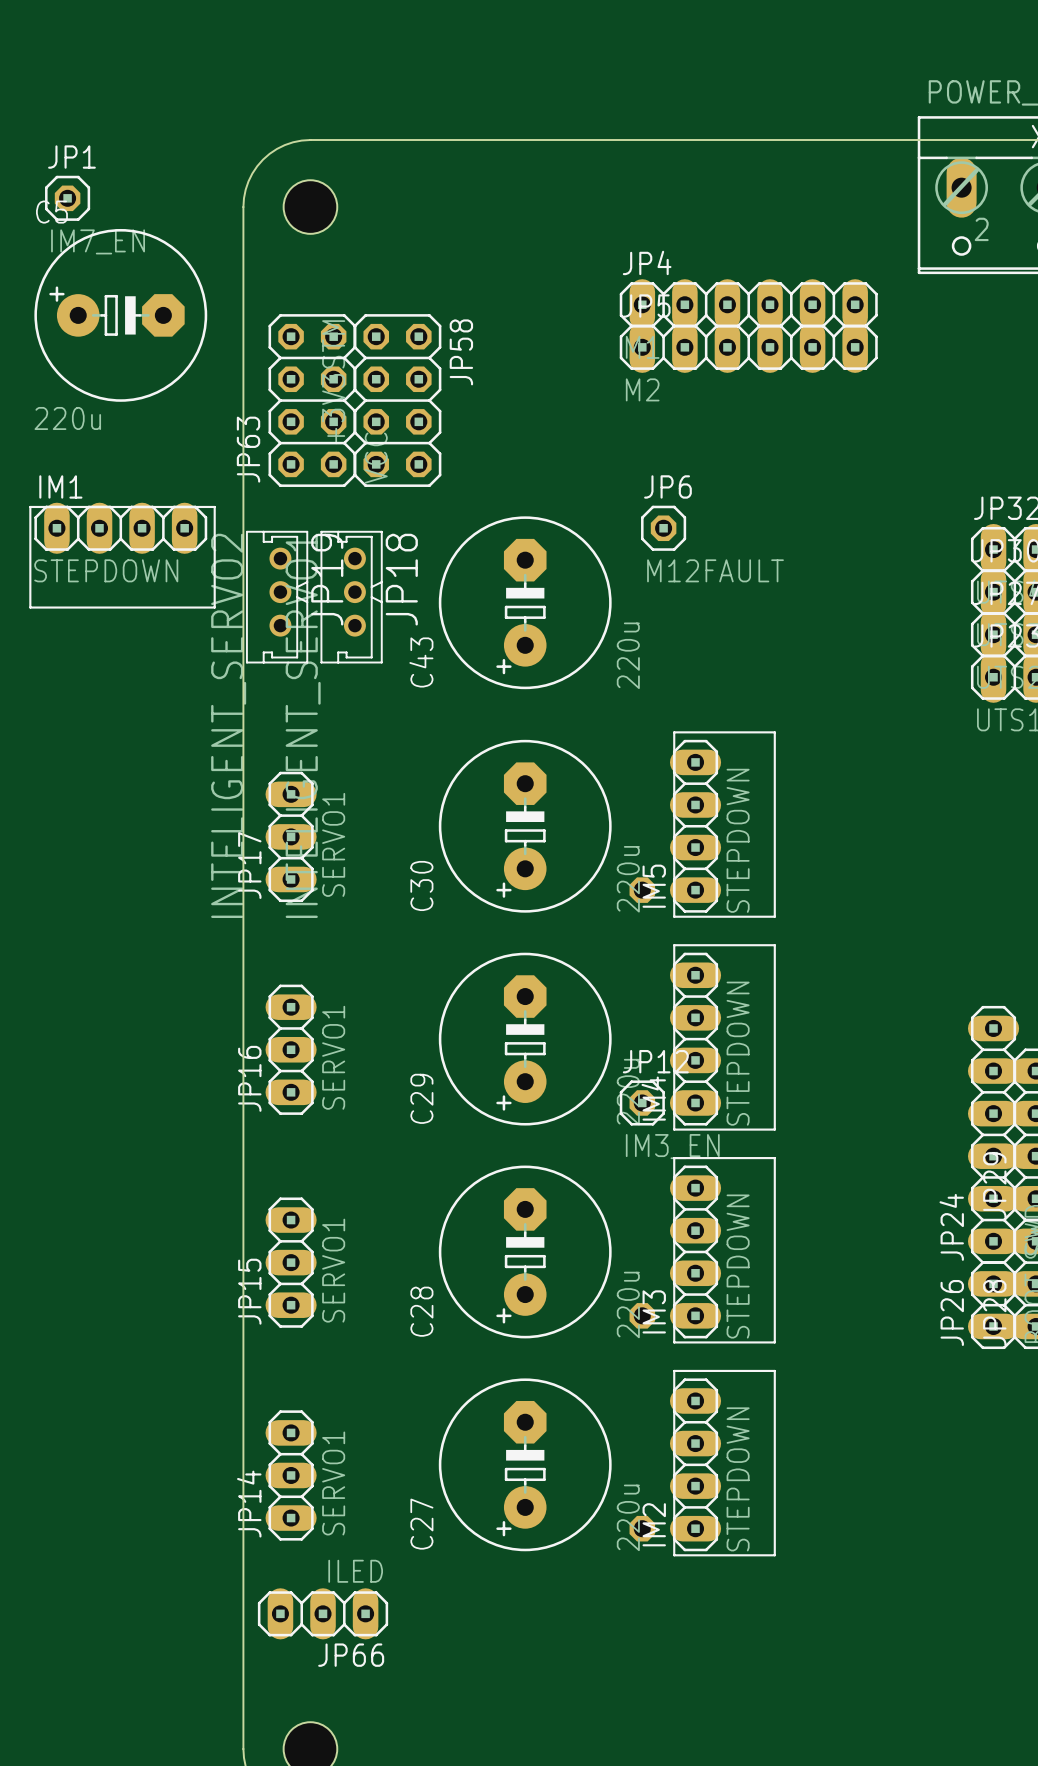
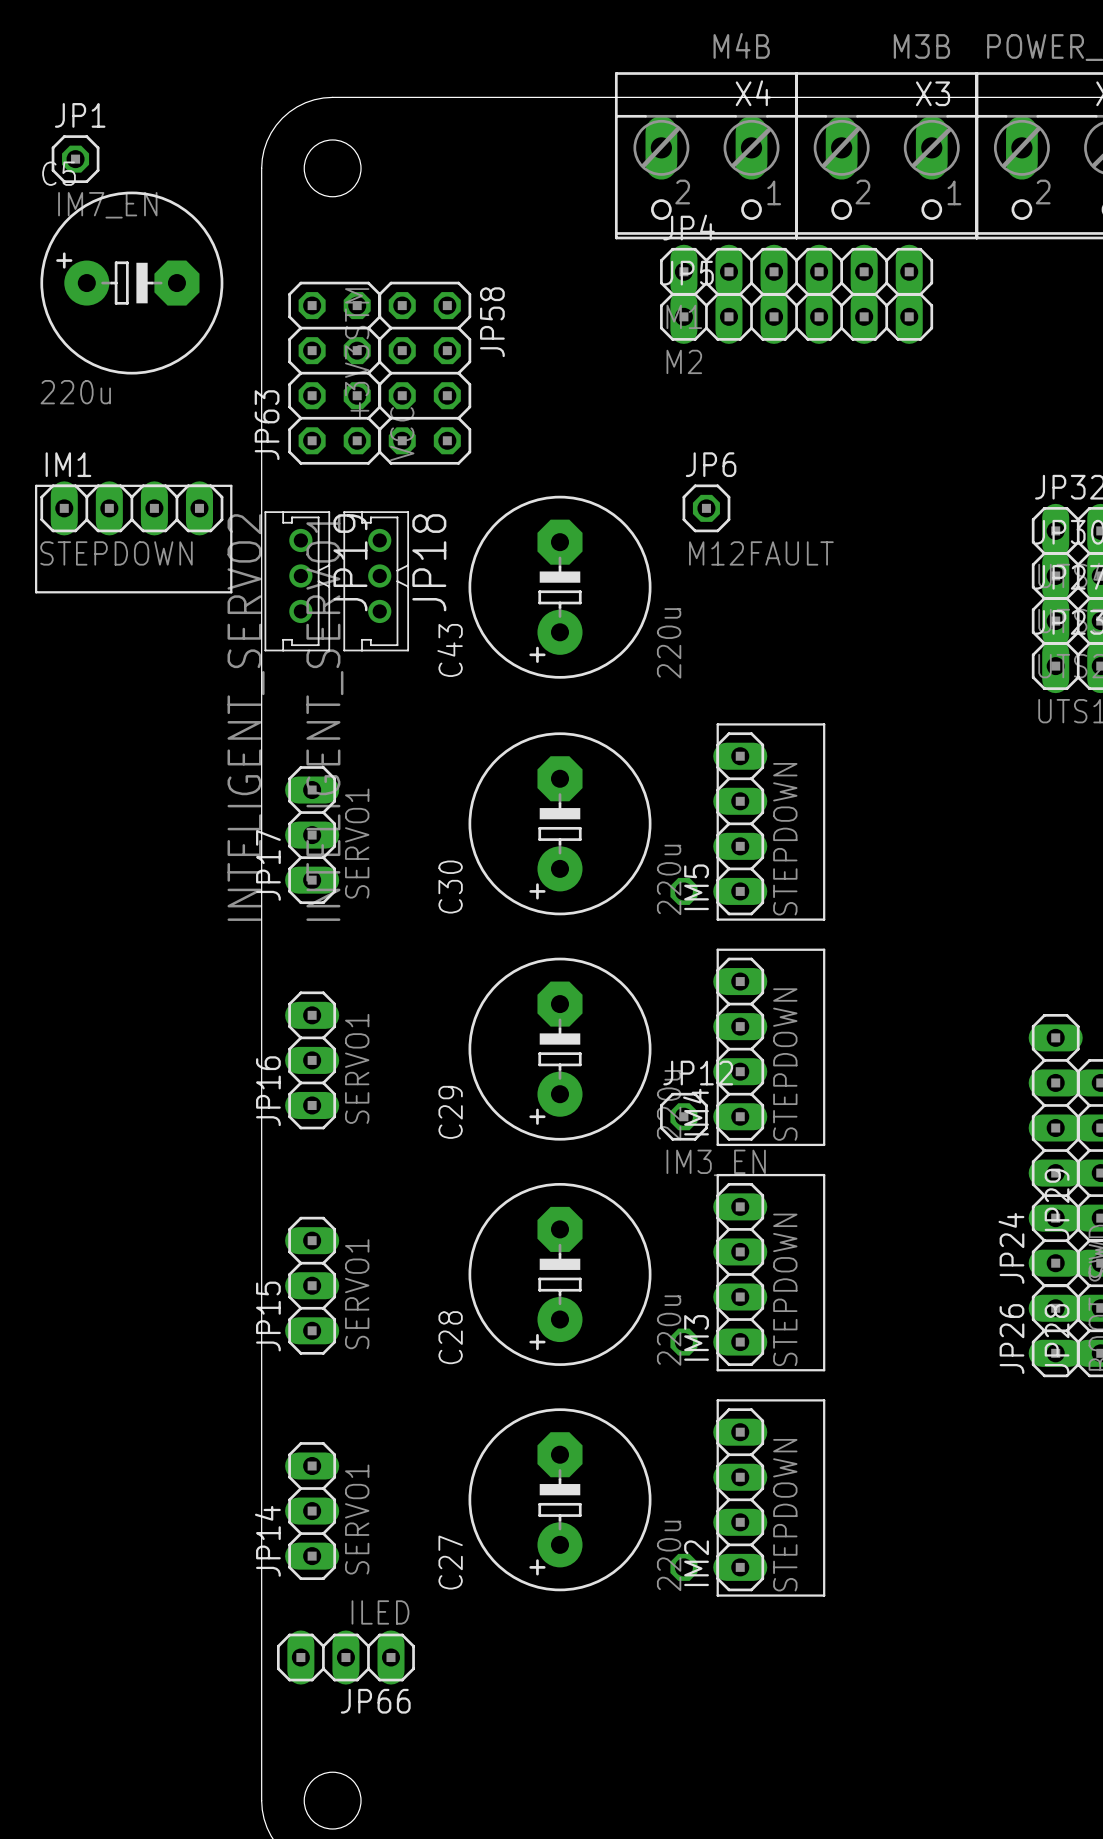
X4: none -> M4B (706, 155)
X3: none -> M3B (886, 155)

